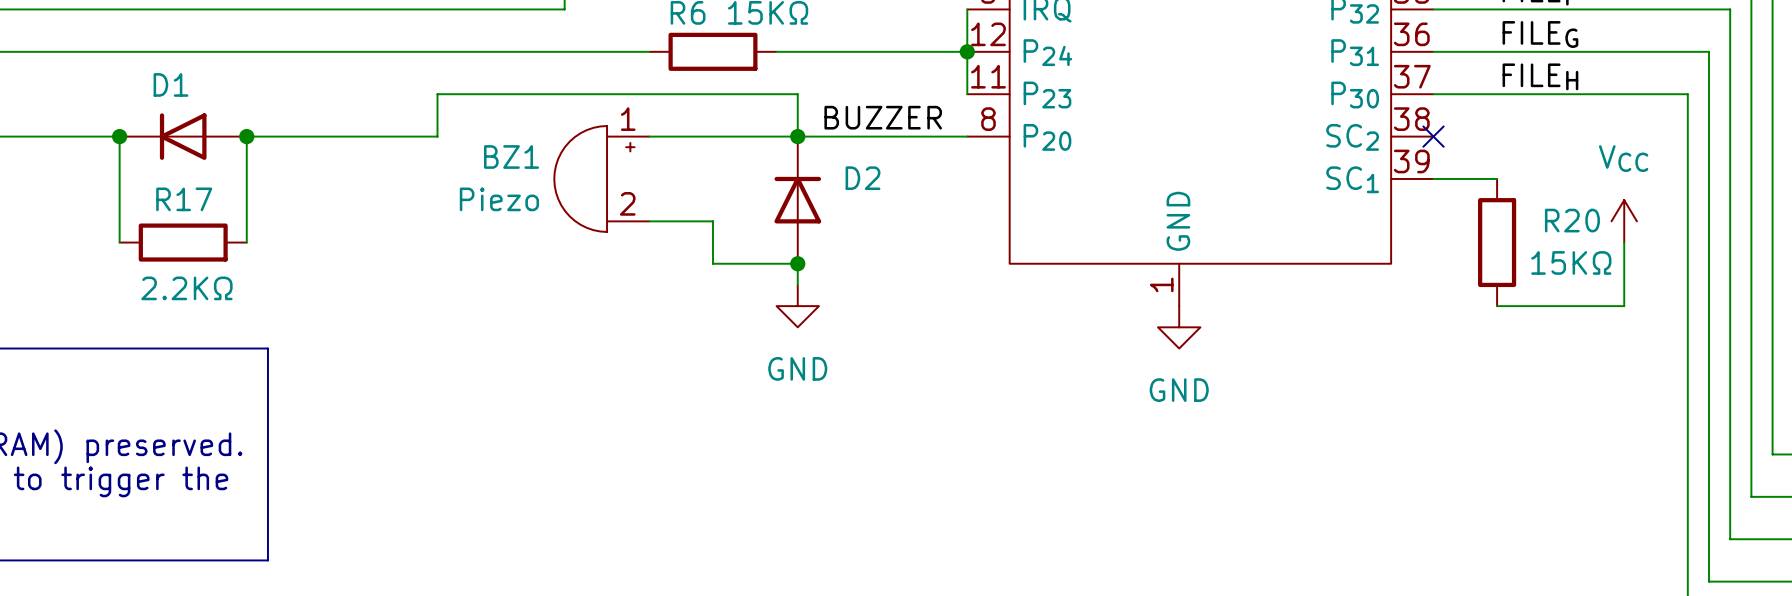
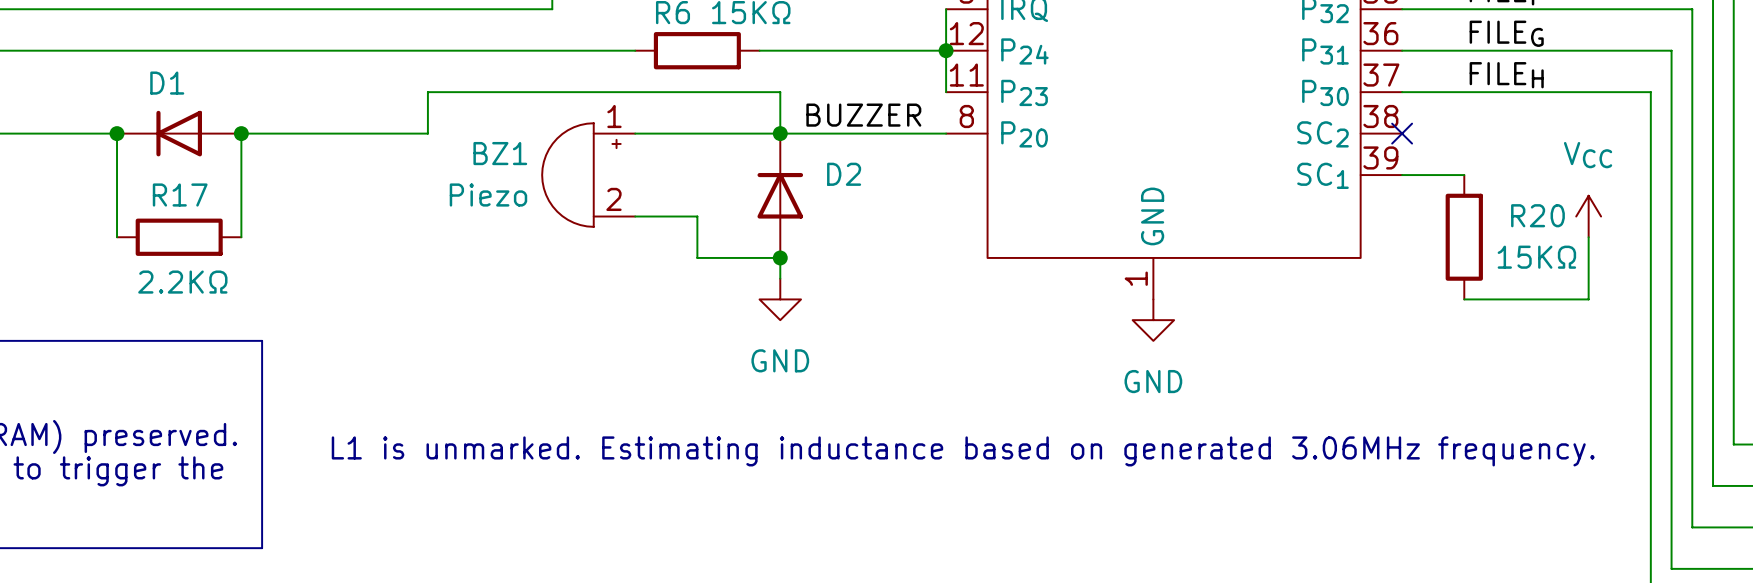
text: none -> L1 is unmarked. Estimating inductance based on generated 3.06MHz frequency. (963, 451)

